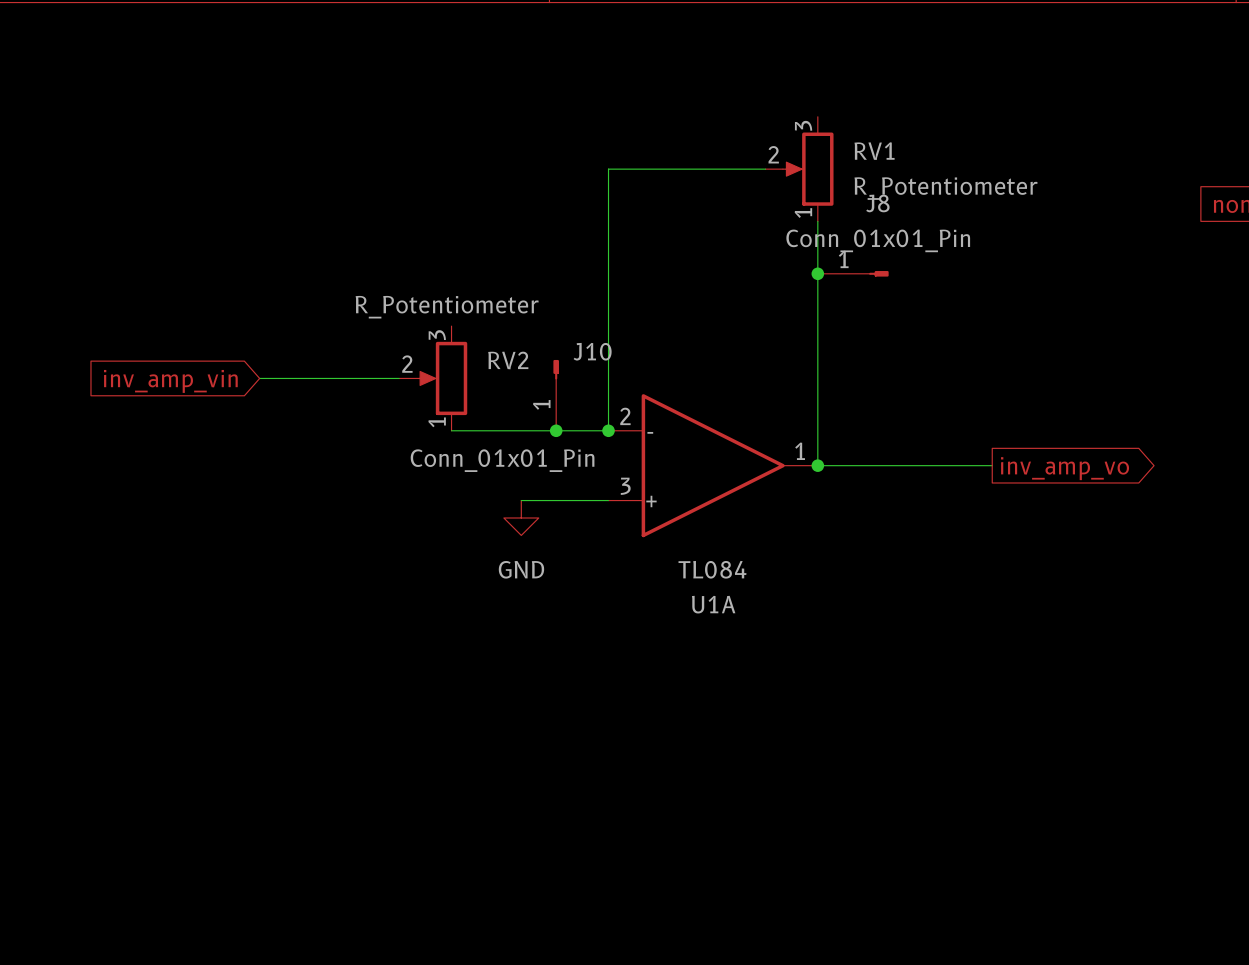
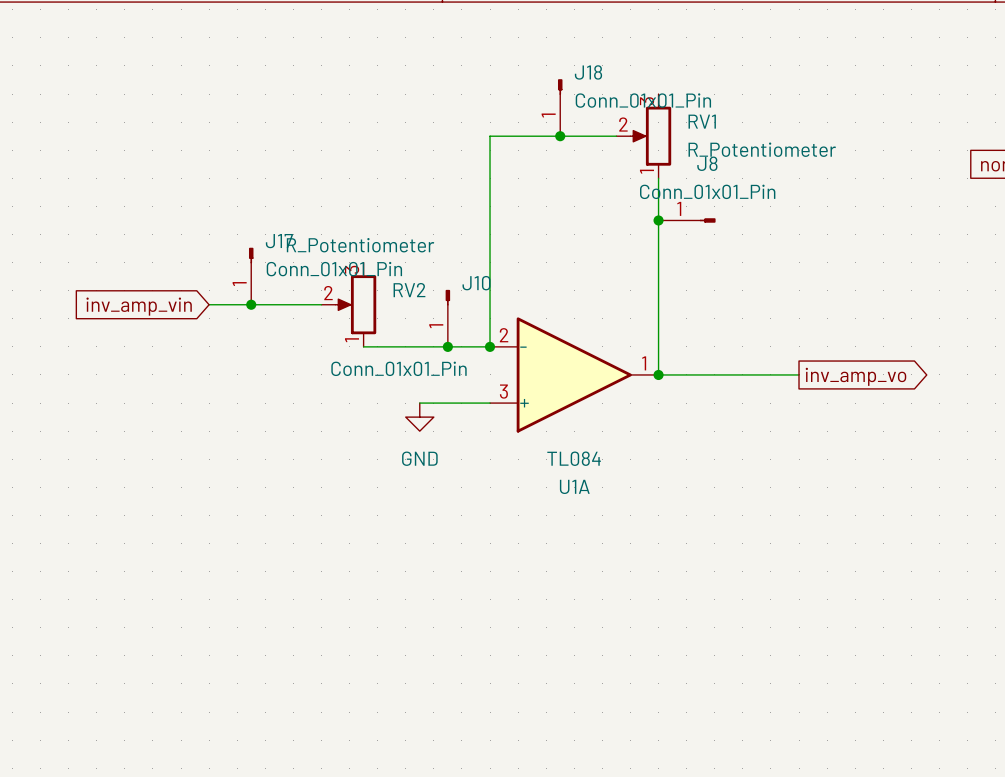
J18: none -> Conn_01x01_Pin (560, 107)
junction: none -> (560, 136)
J17: none -> Conn_01x01_Pin (251, 276)
junction: none -> (251, 304)

